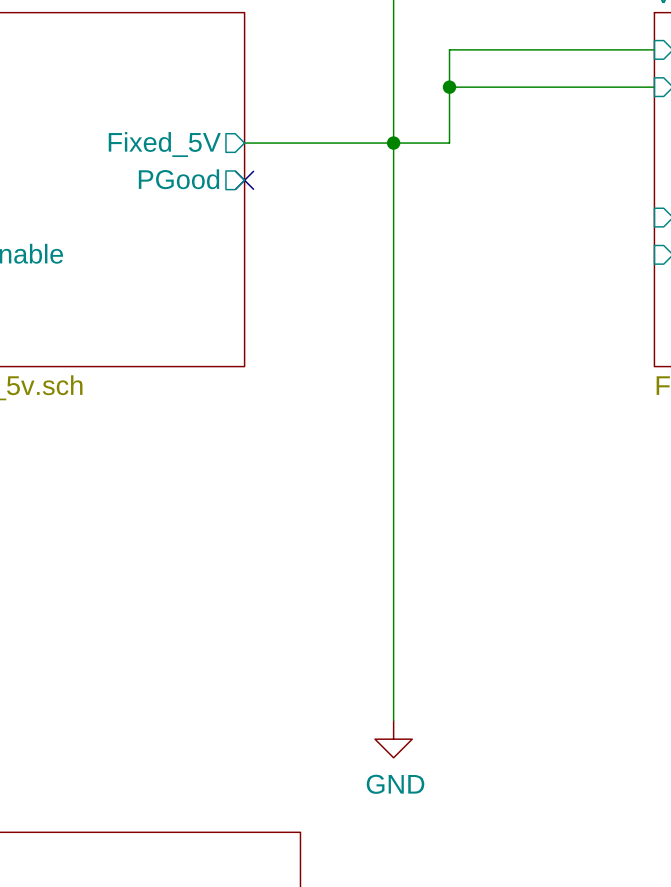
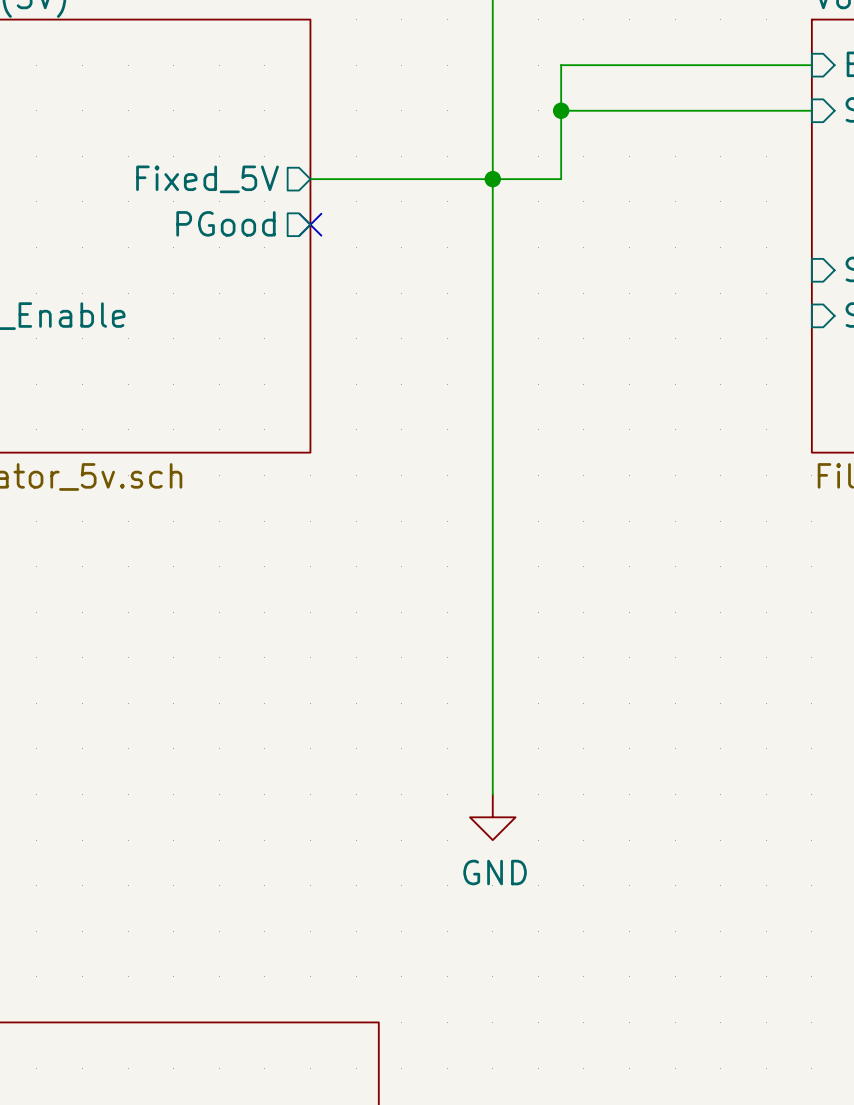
wire: (393, 646) (393, 720) -> none
power symbol position: GND (393, 739) -> GND (492, 817)

